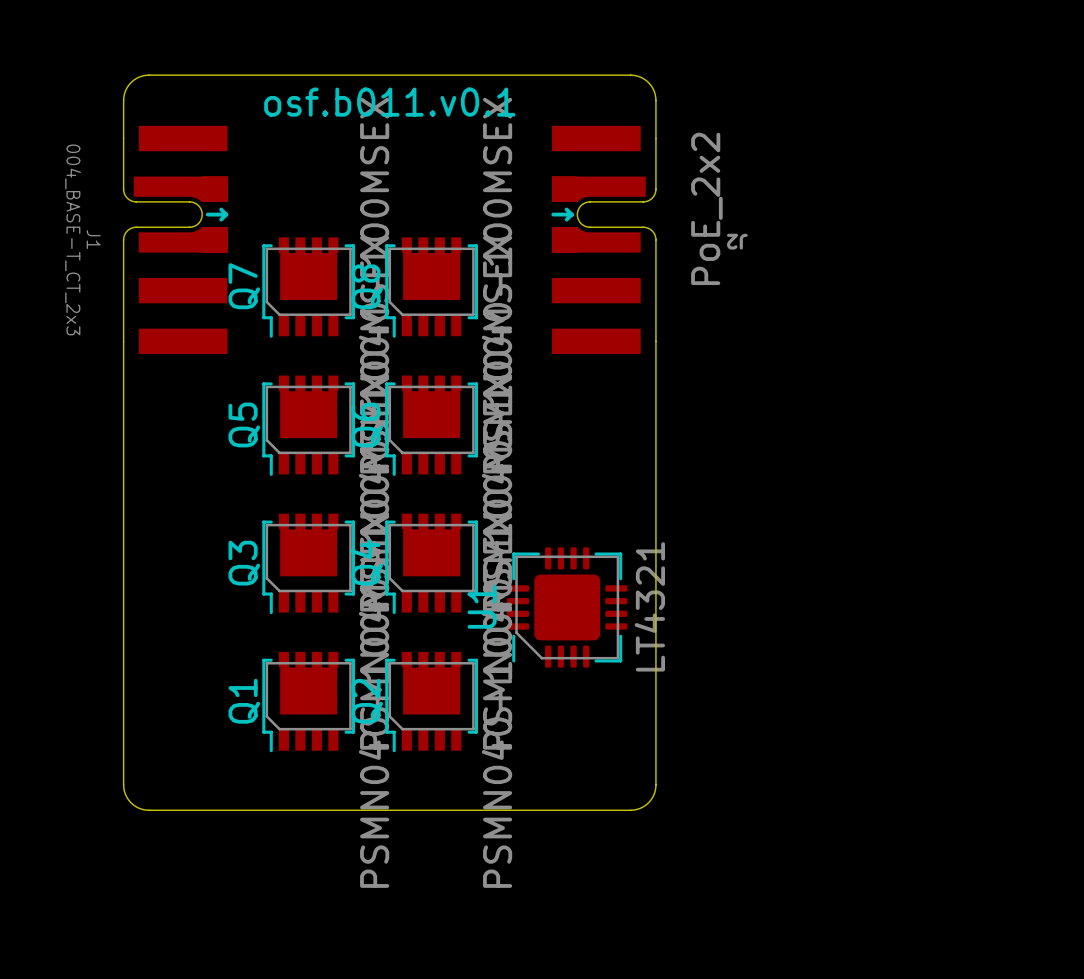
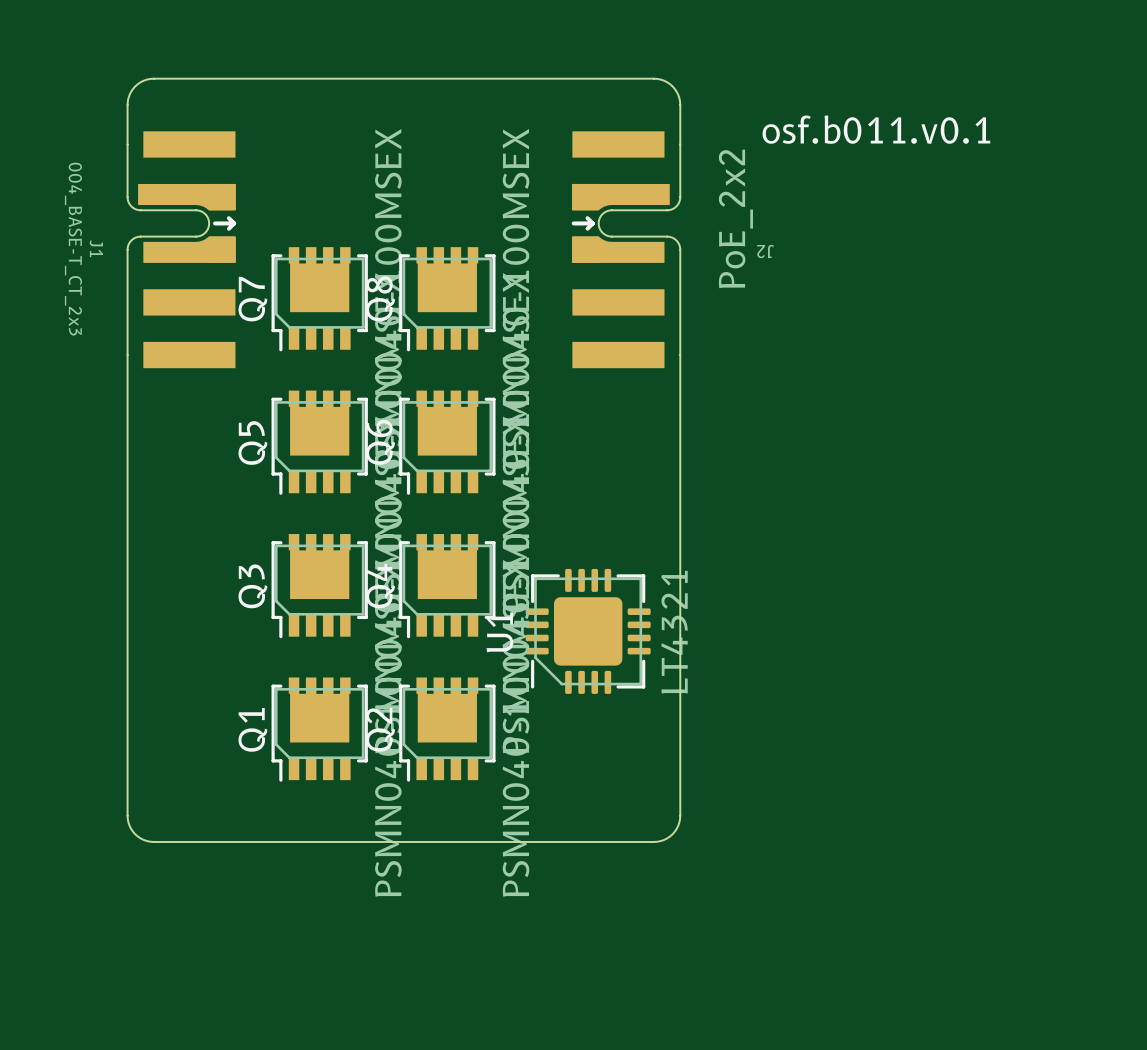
text position: osf.b011.v0.1 (389, 102) -> osf.b011.v0.1 (876, 129)

